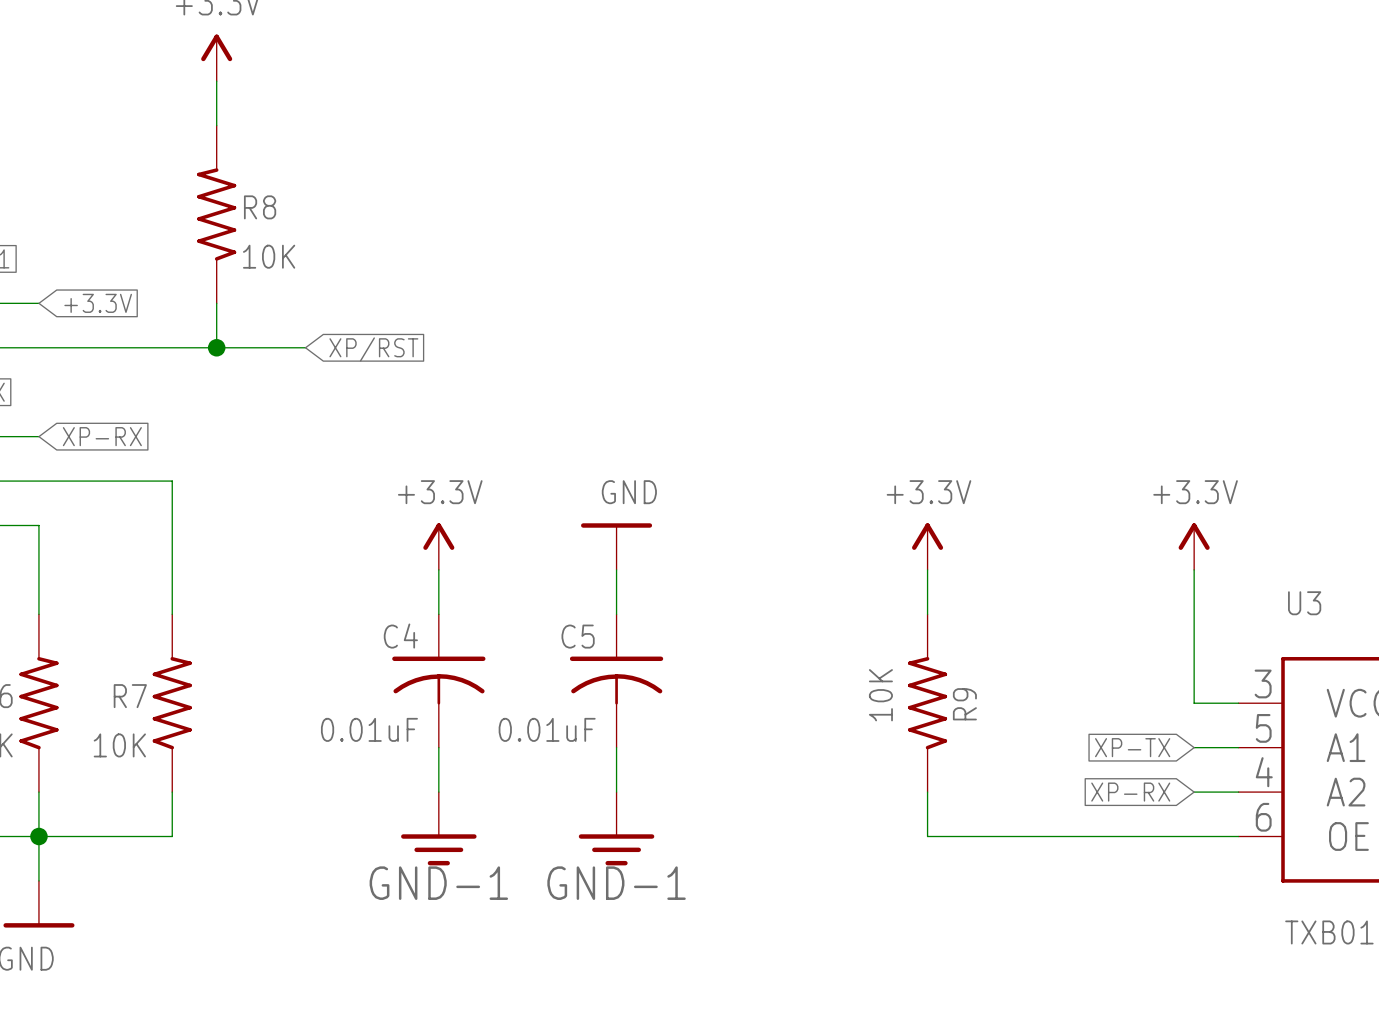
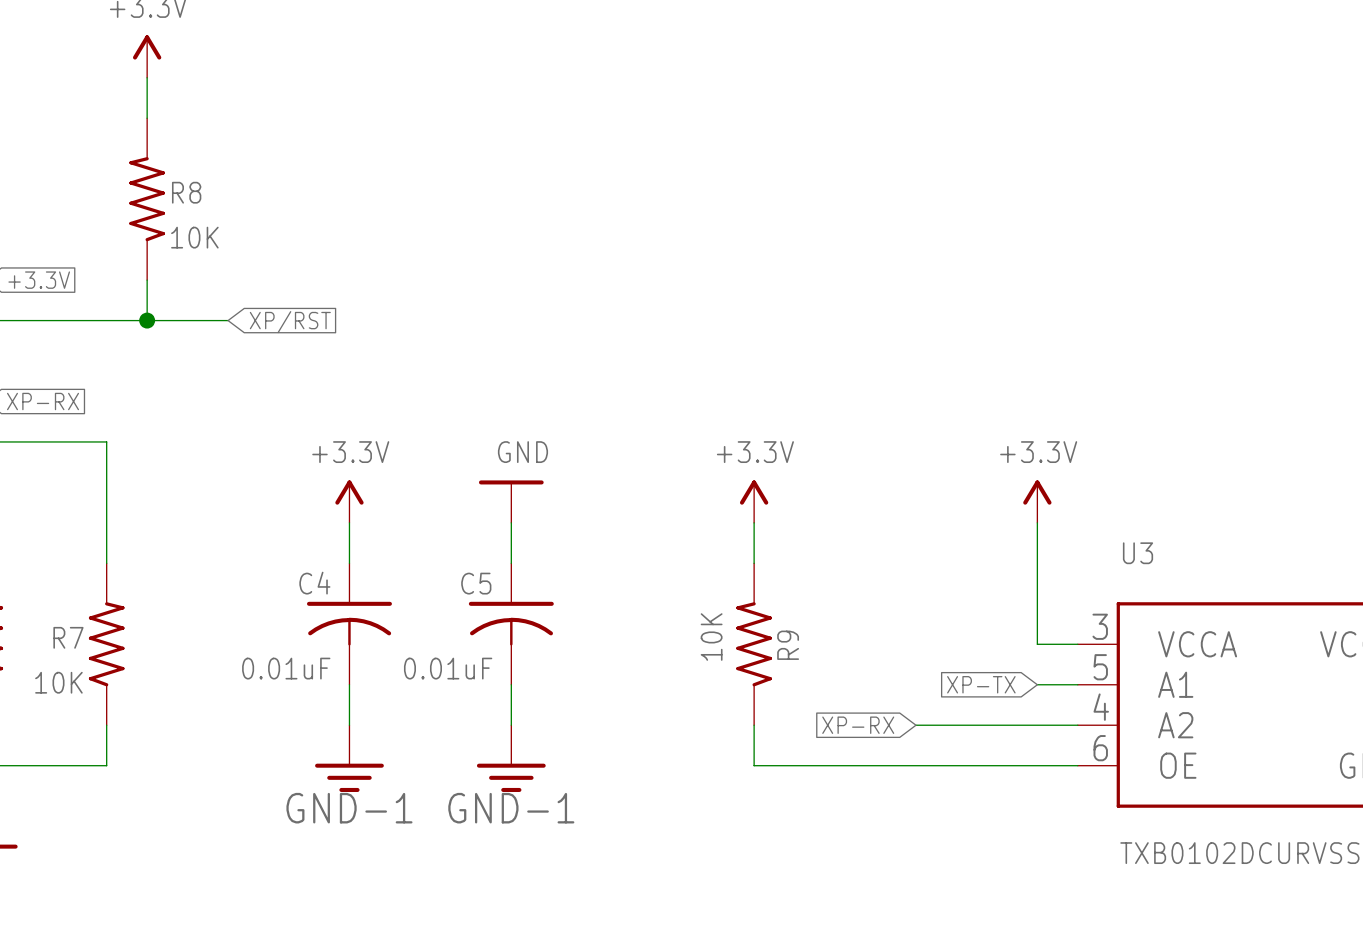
power symbol position: +3.3V (927, 546) -> +3.3V (754, 501)
wire: (927, 569) (927, 614) -> (754, 522) (754, 563)
R9 position: (927, 703) -> (754, 644)
wire: (927, 792) (927, 836) -> (754, 725) (754, 765) (794, 765)
wire: none -> (915, 725) (1037, 725)
global label position: XP-RX (1130, 792) -> XP-RX (858, 725)

